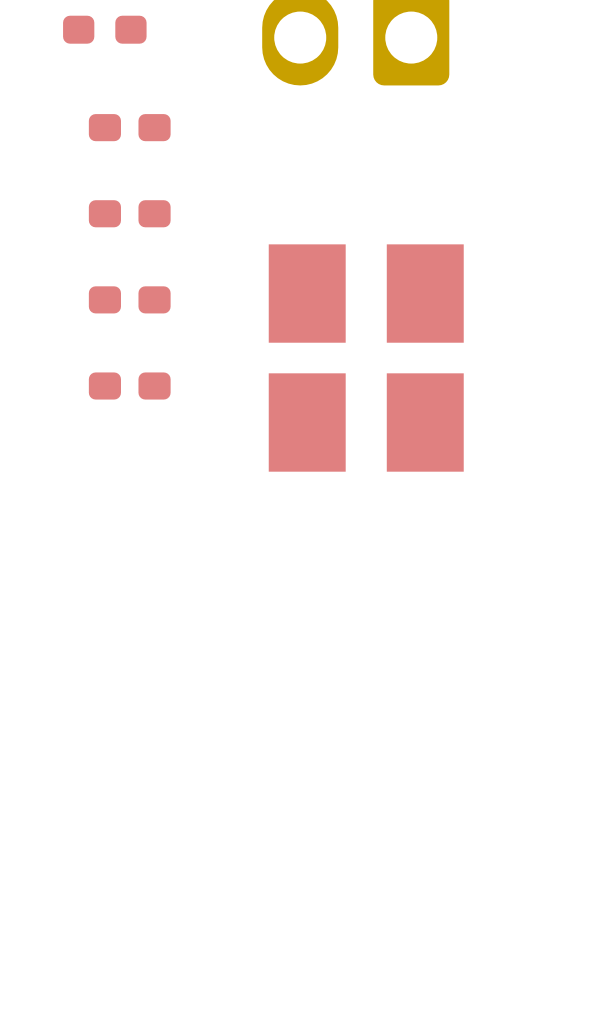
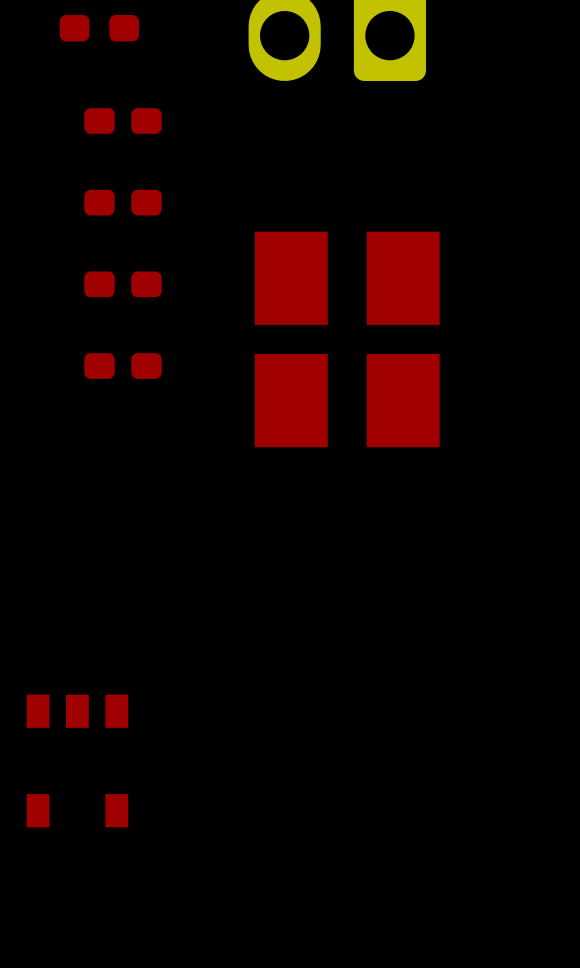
part: none -> (77, 761)

